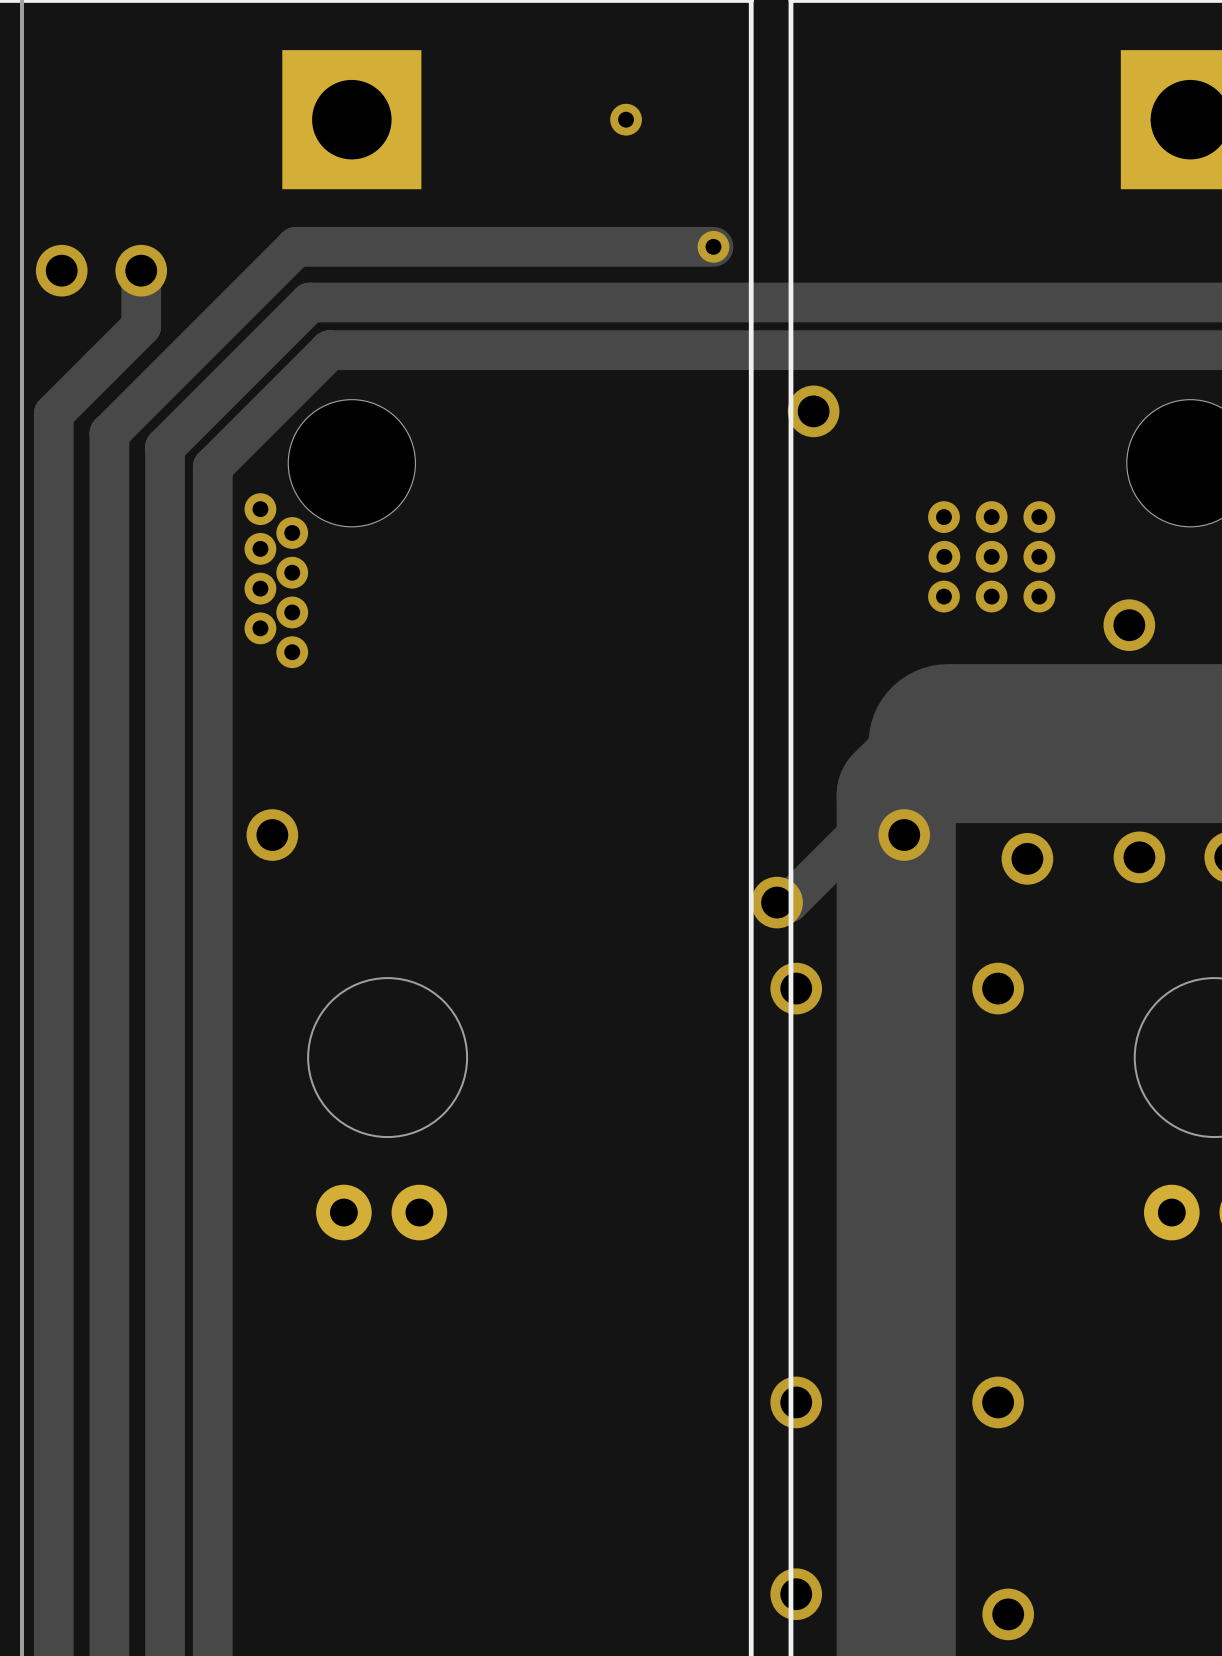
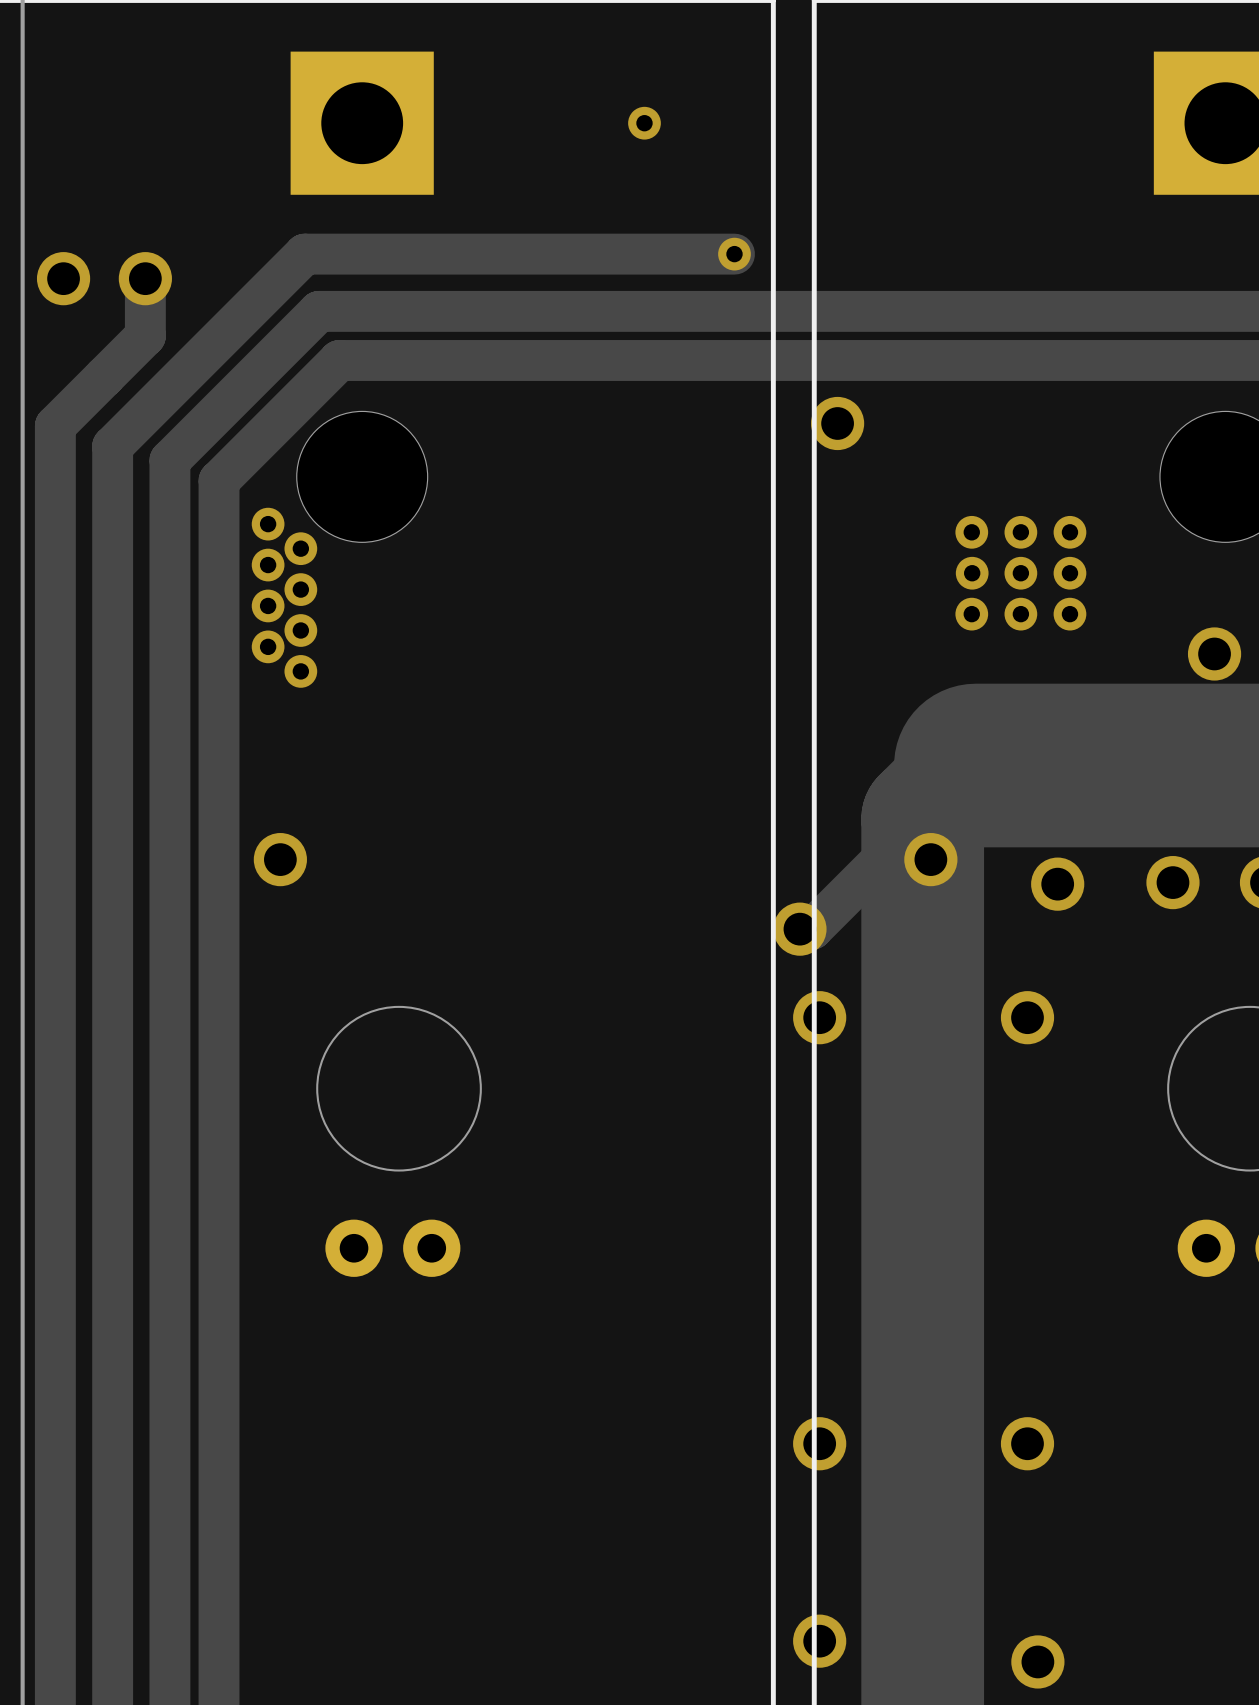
via: (1129, 625) -> none
via: none -> (1214, 653)

